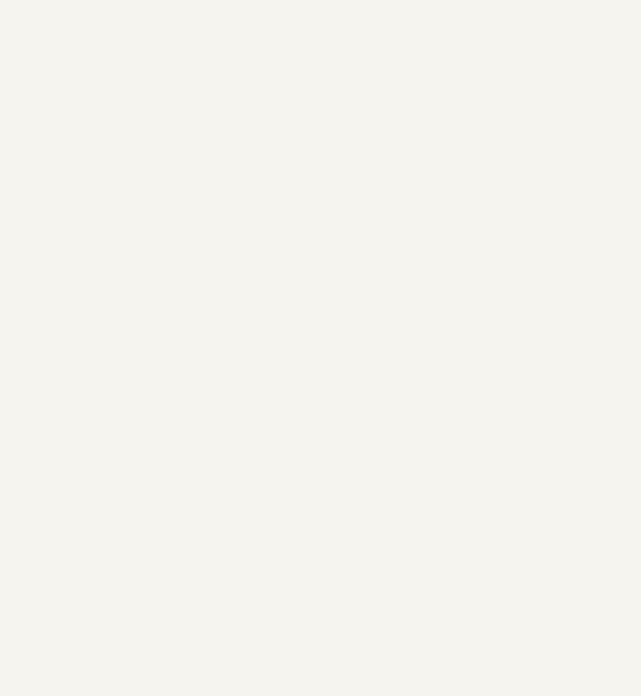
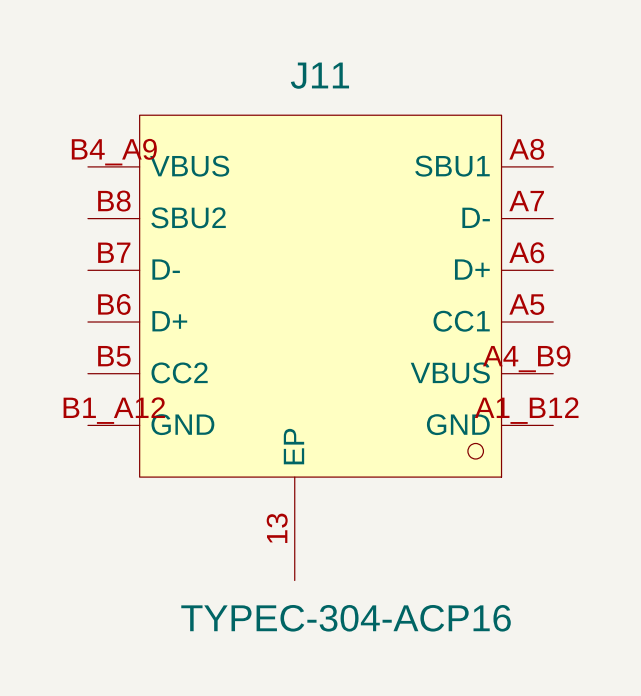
J11: none -> TYPEC-304-ACP16 (320, 347)

